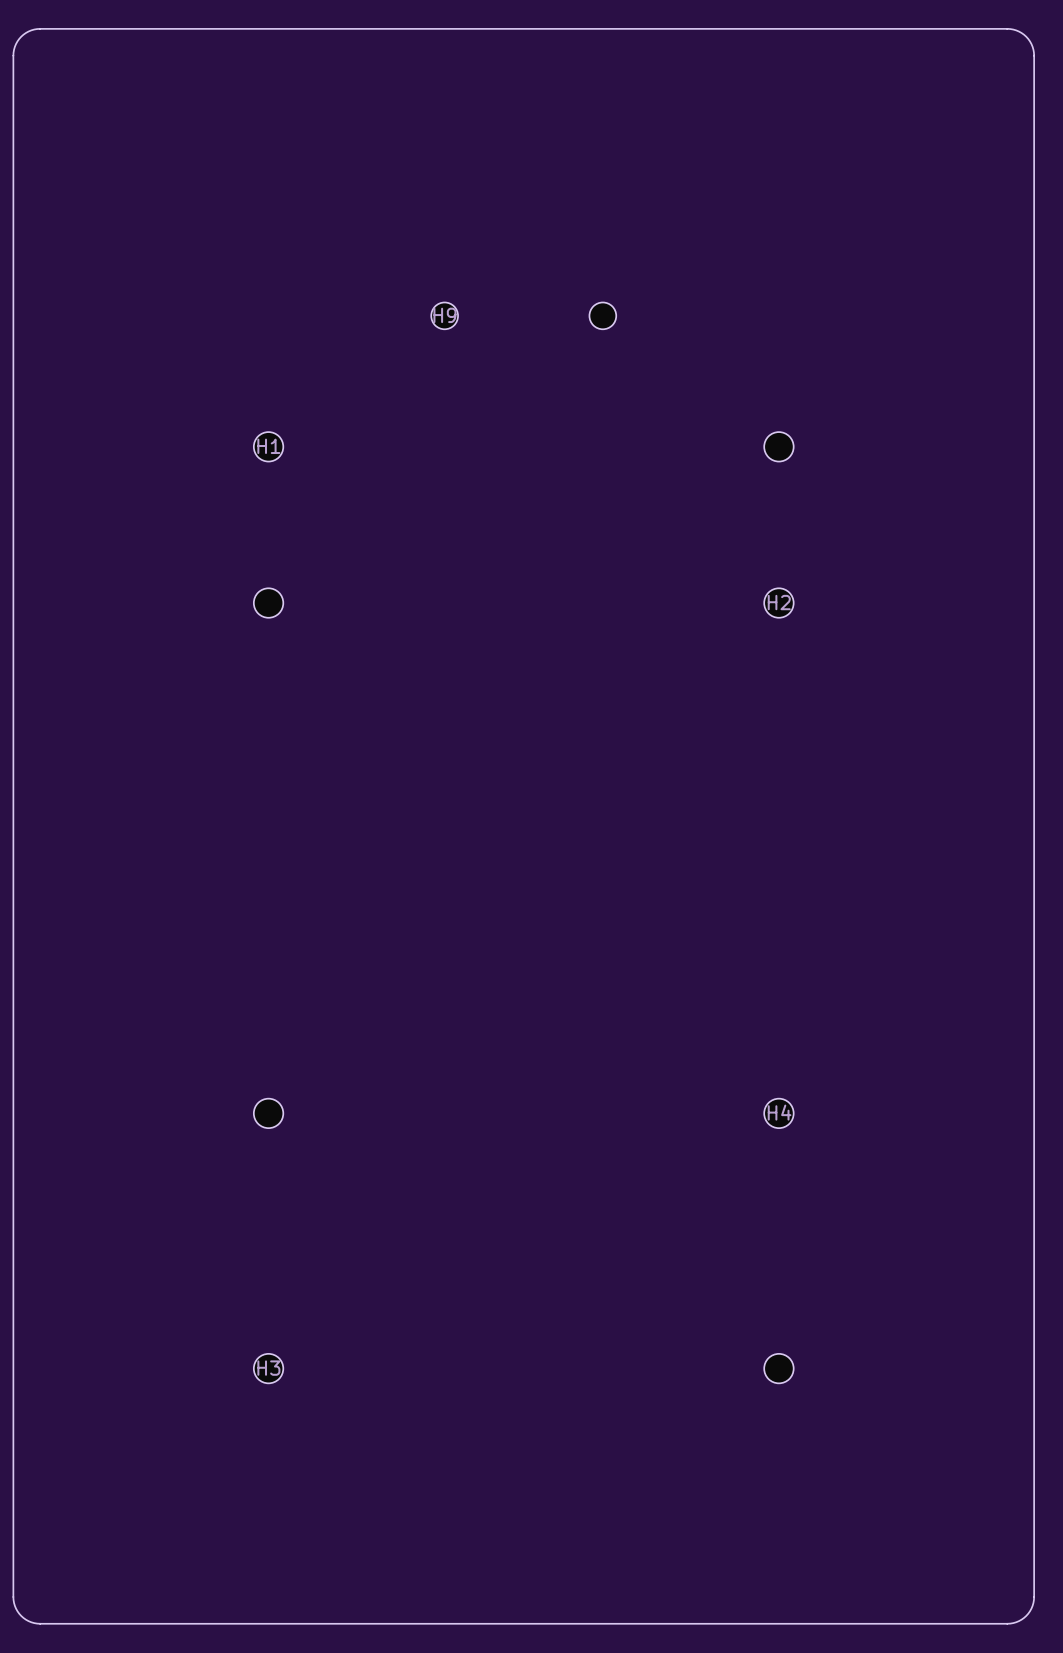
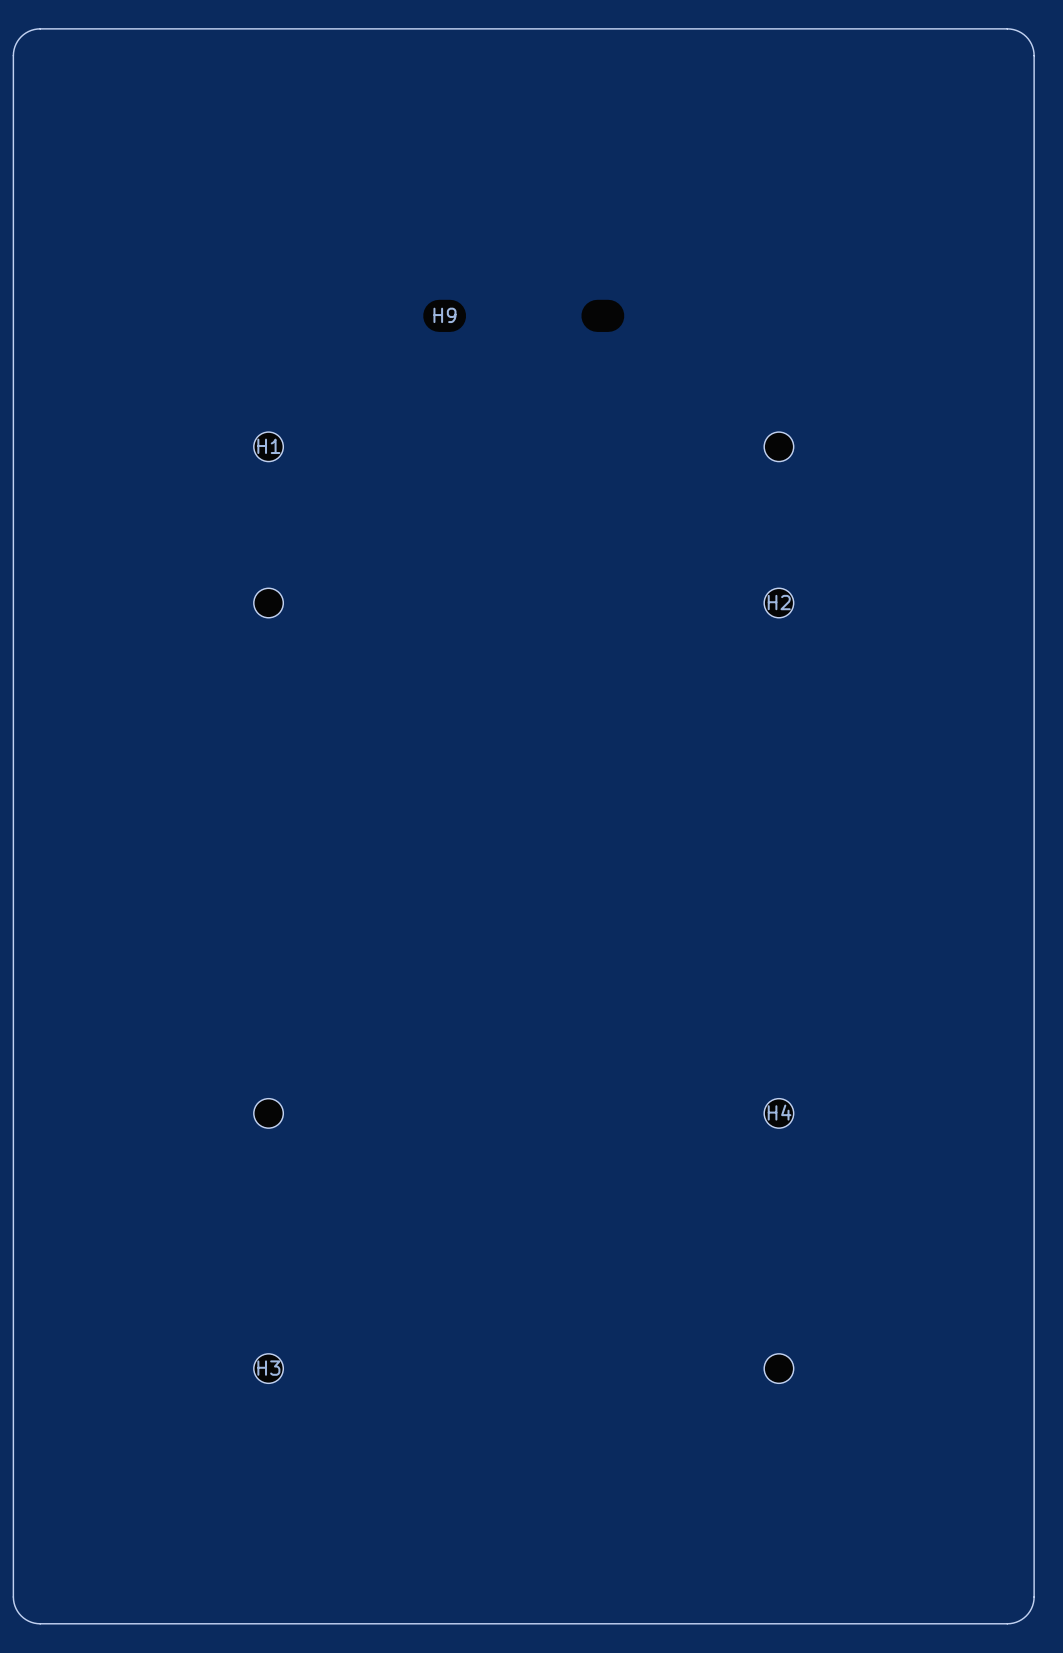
H9 footprint: [431, 302, 459, 330] -> [423, 299, 467, 332]
part footprint: [589, 302, 617, 330] -> [581, 299, 625, 332]

